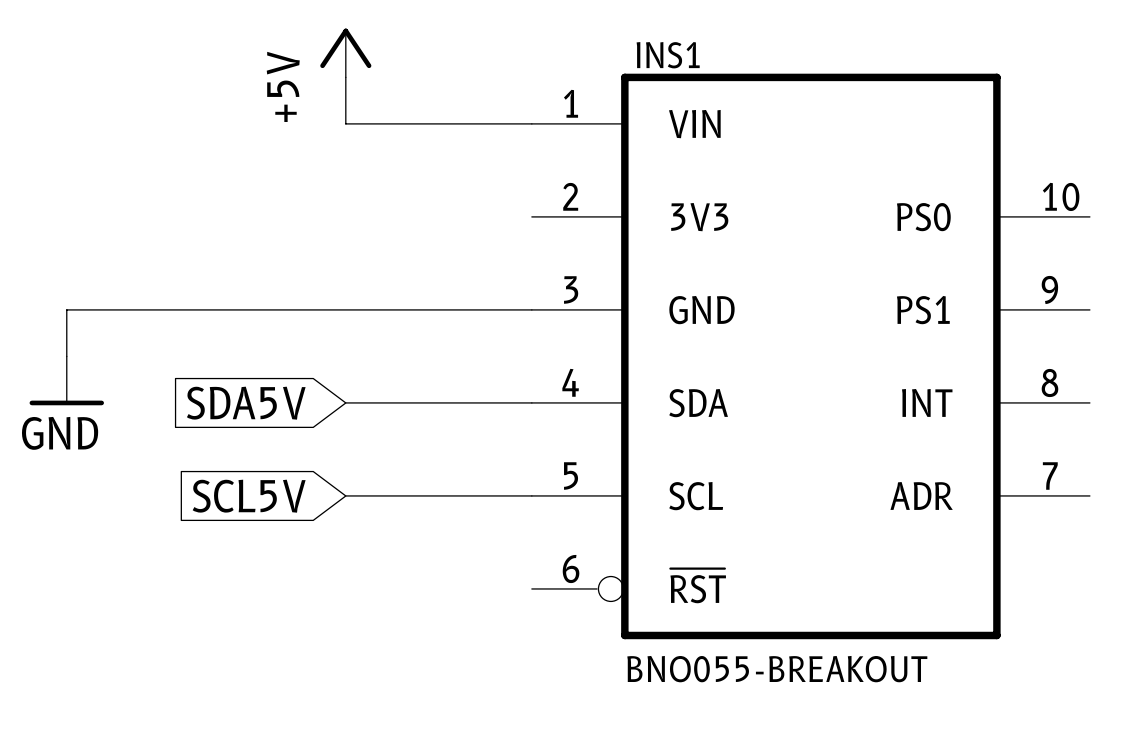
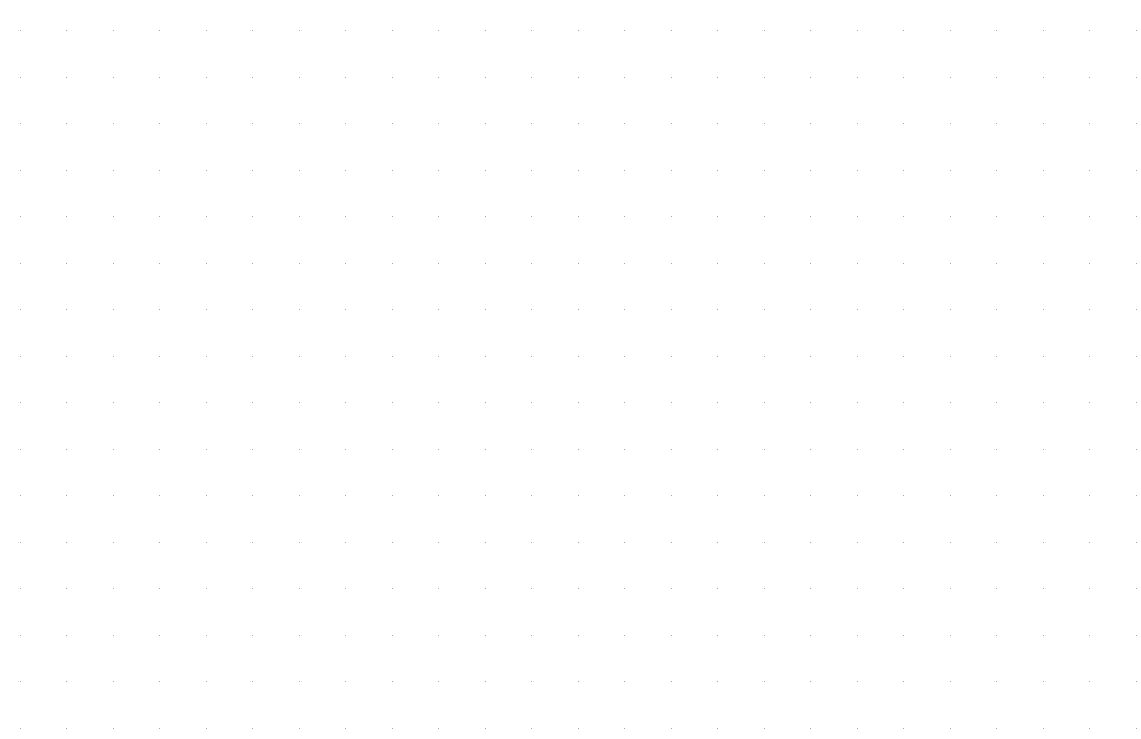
power symbol: +5V (345, 52) -> none
wire: (345, 77) (345, 123) (531, 123) -> none
wire: (531, 309) (66, 309) (66, 356) -> none
INS1: BNO055-BREAKOUT (810, 356) -> none
power symbol: GND (66, 380) -> none
wire: (345, 402) (531, 402) -> none
global label: SDA5V (246, 403) -> none
wire: (345, 495) (531, 495) -> none
global label: SCL5V (249, 496) -> none

